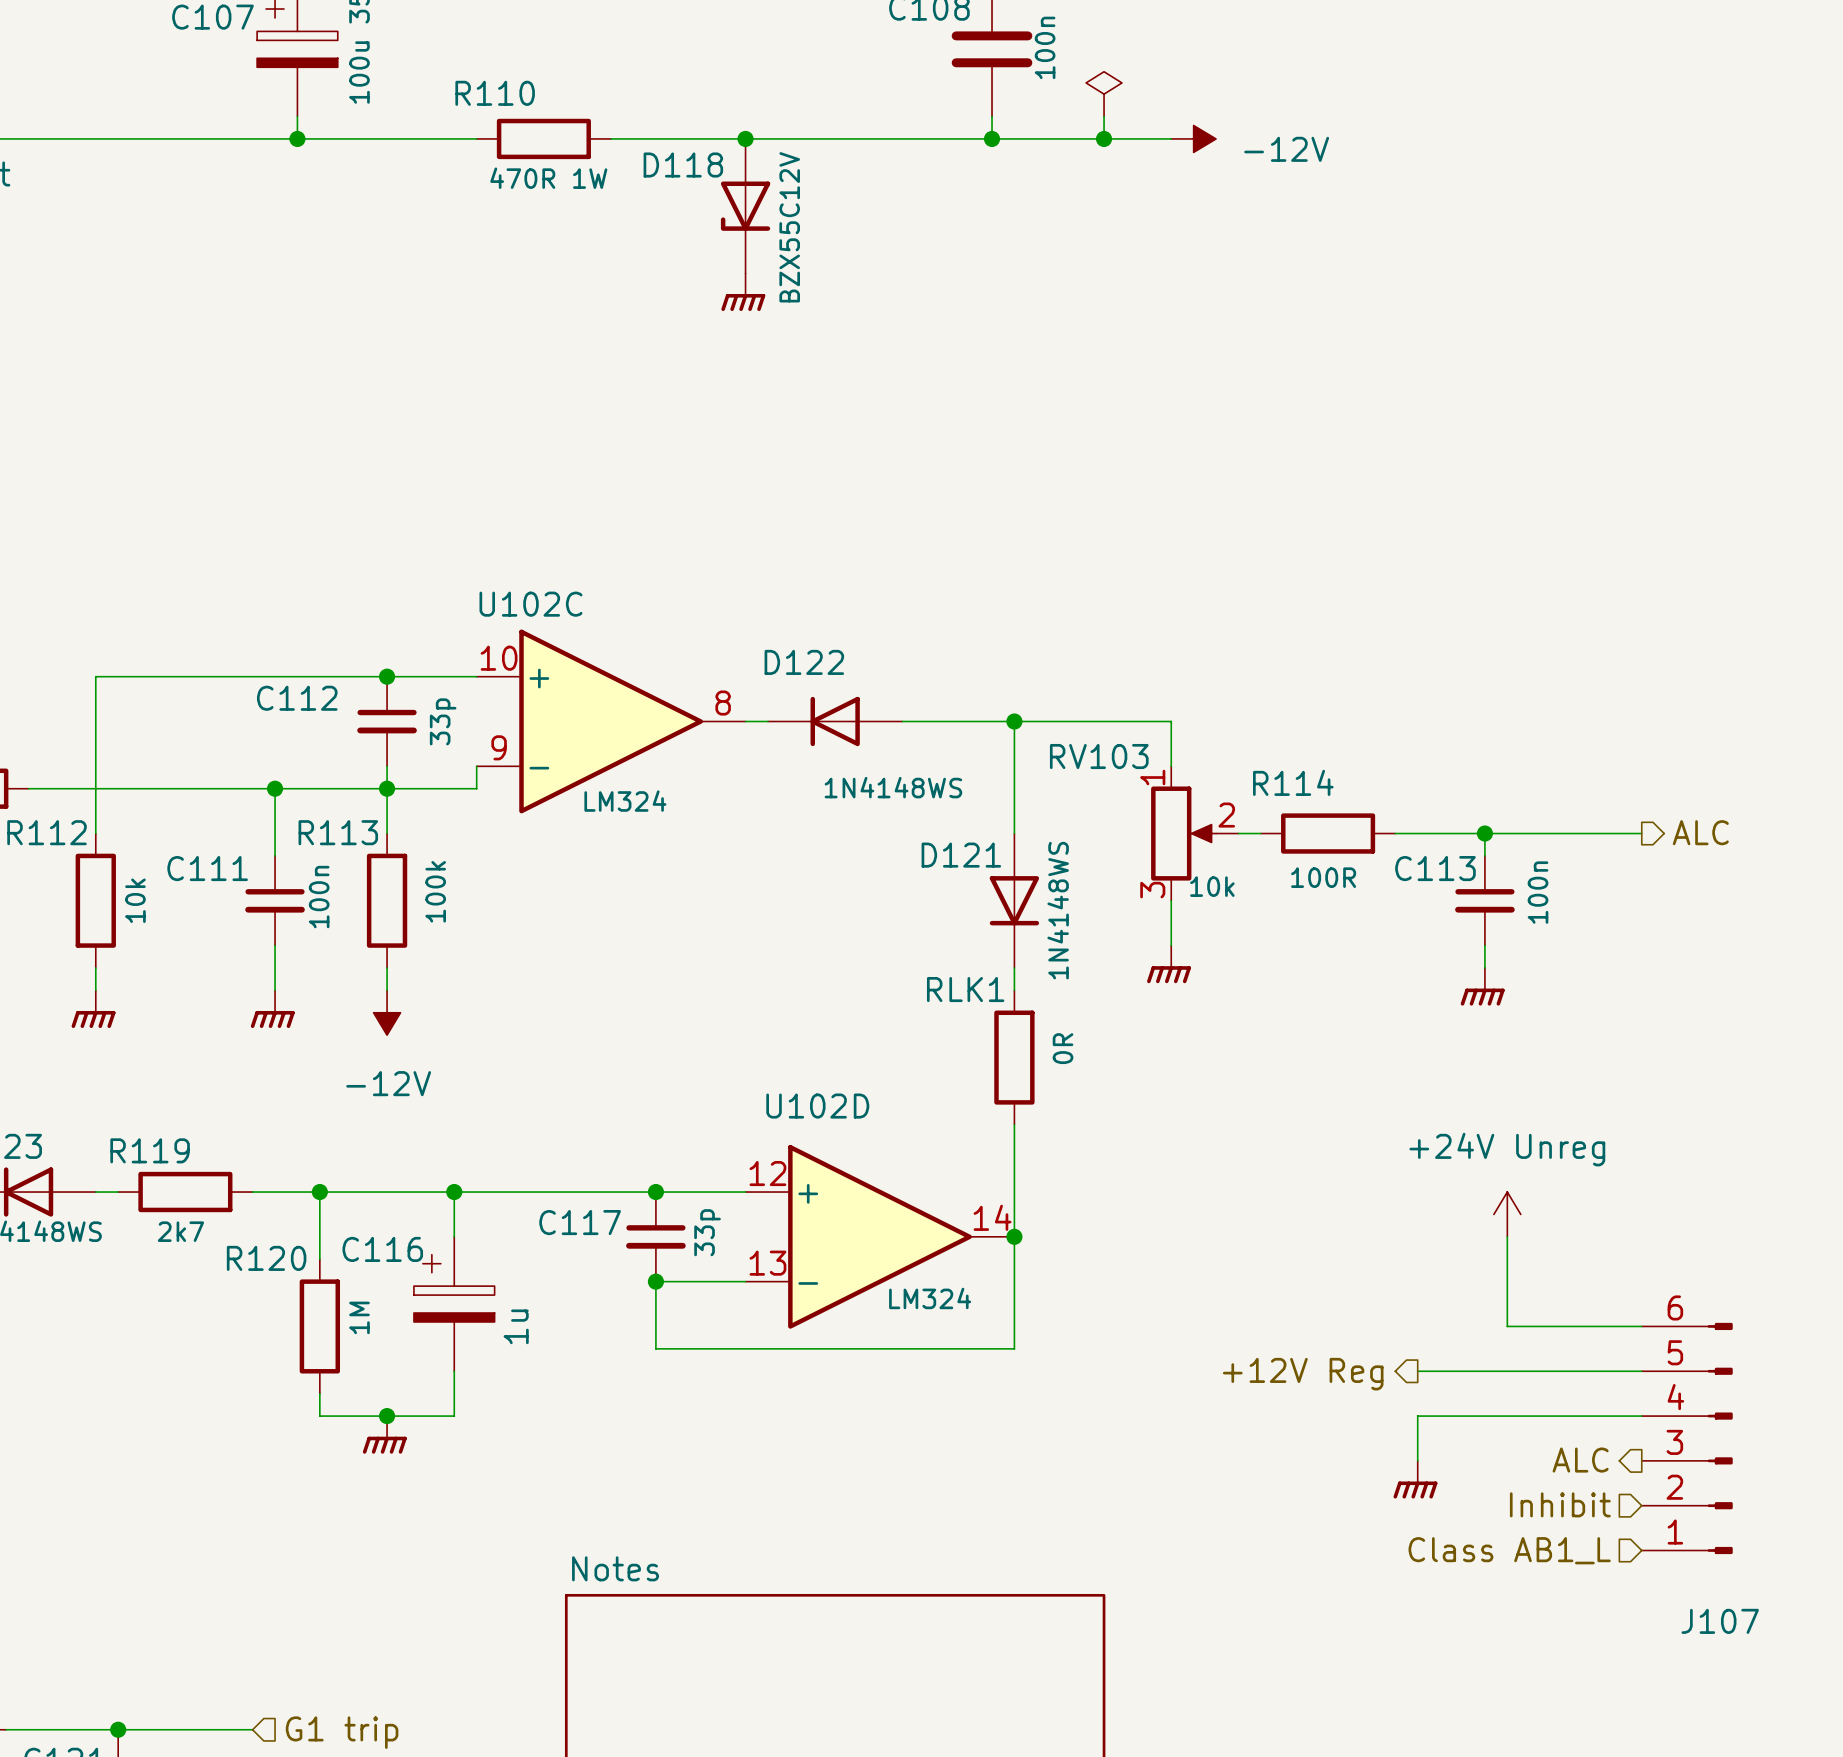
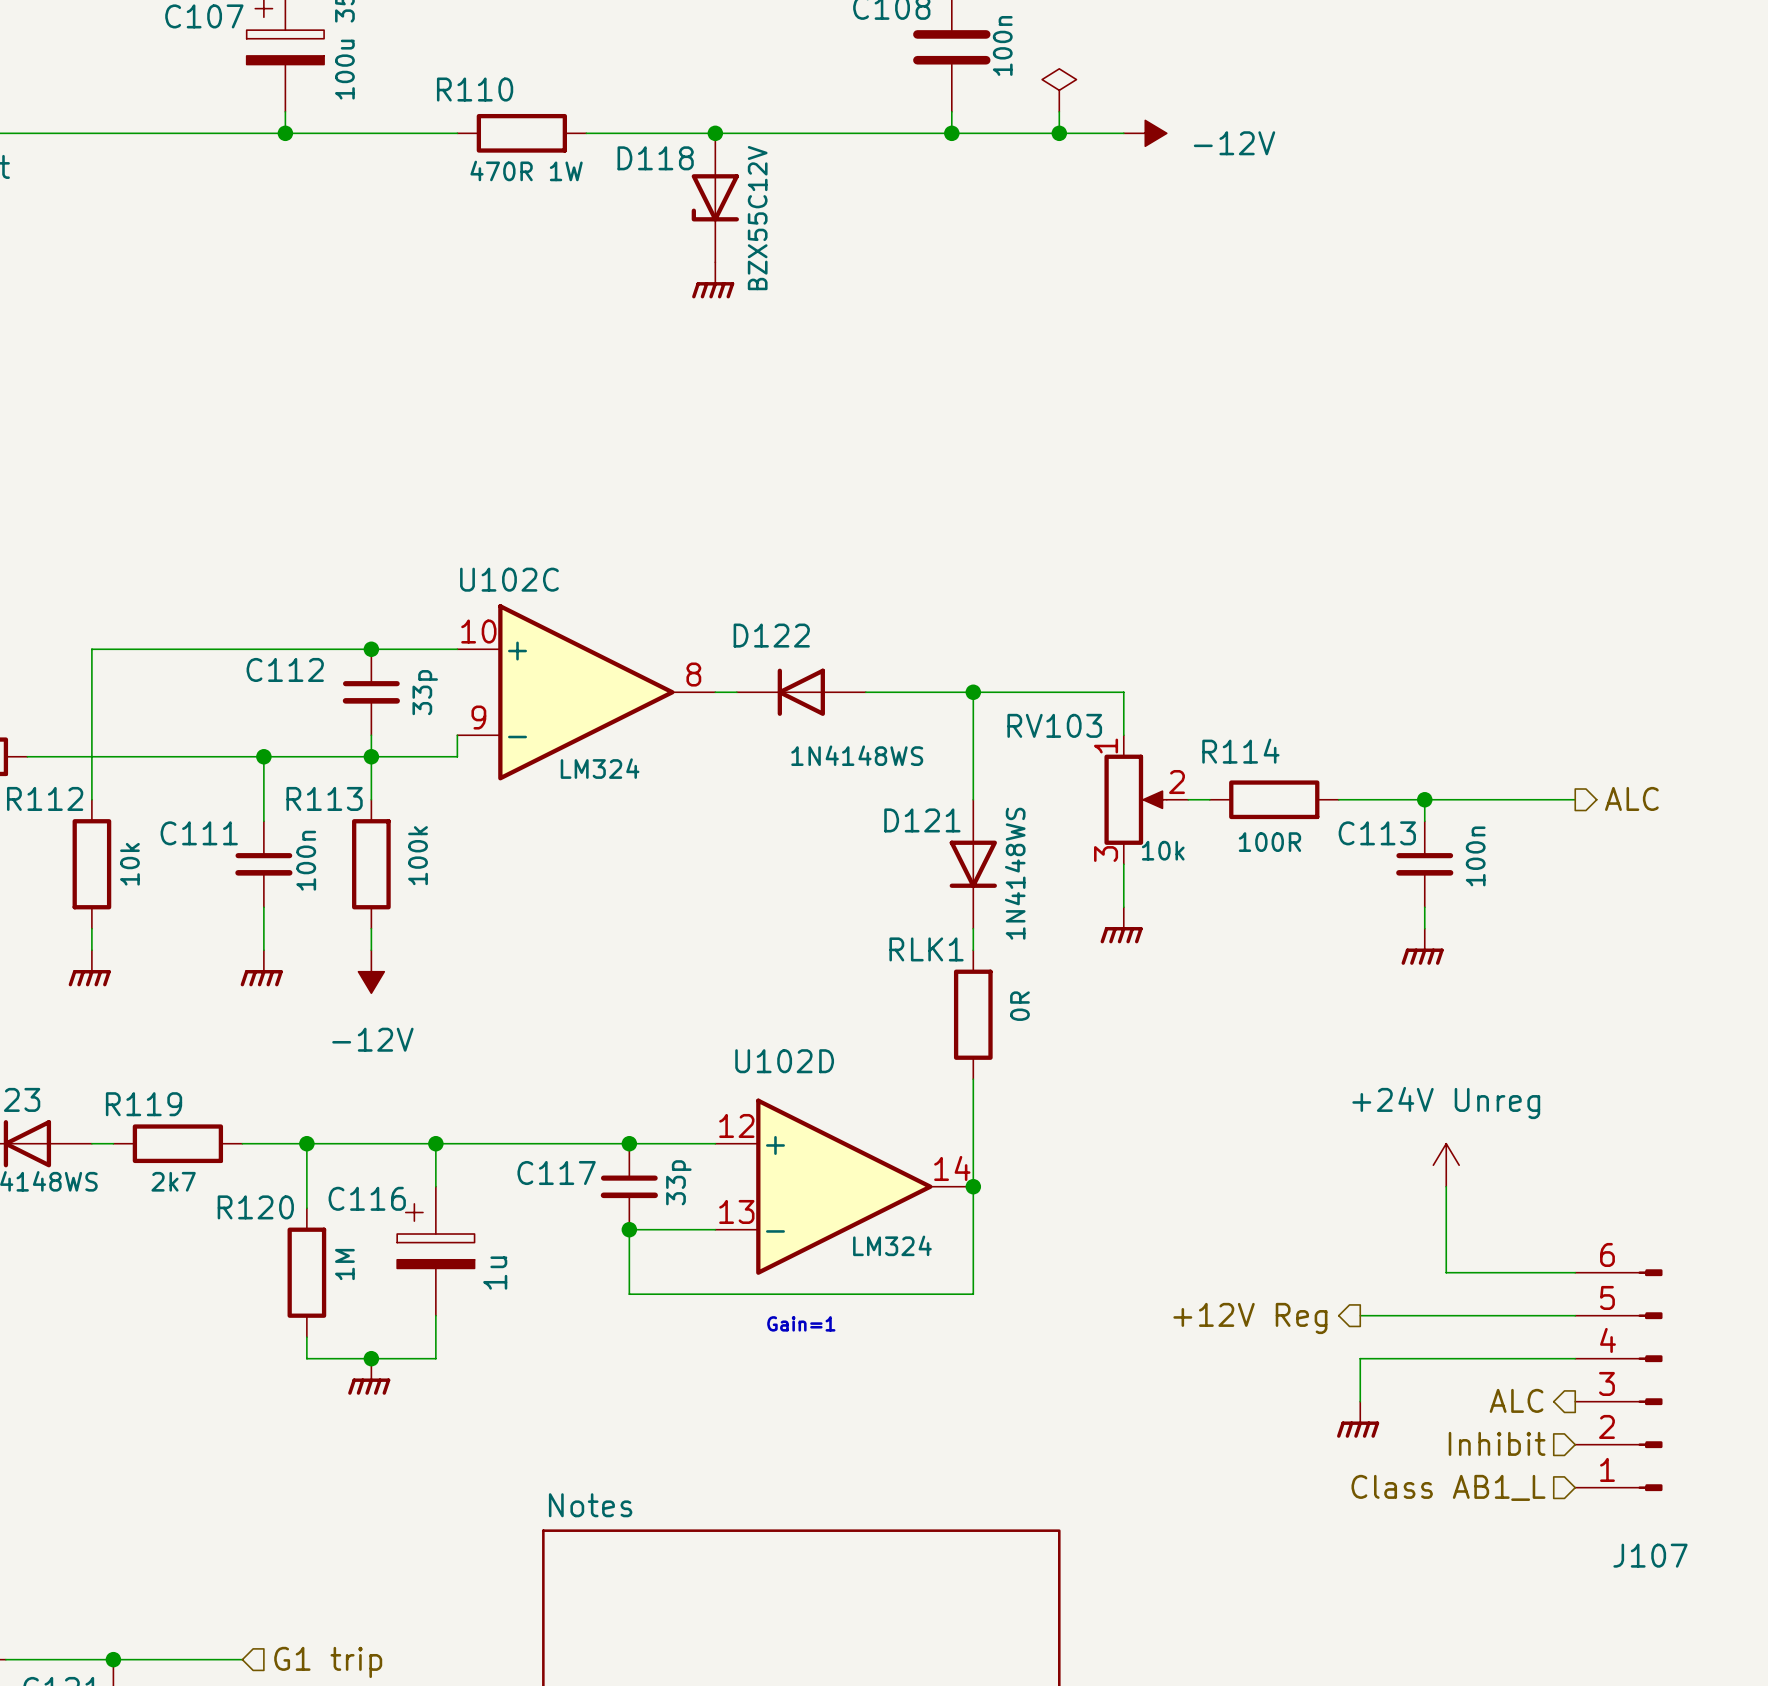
text: none -> Gain=1 (801, 1323)

